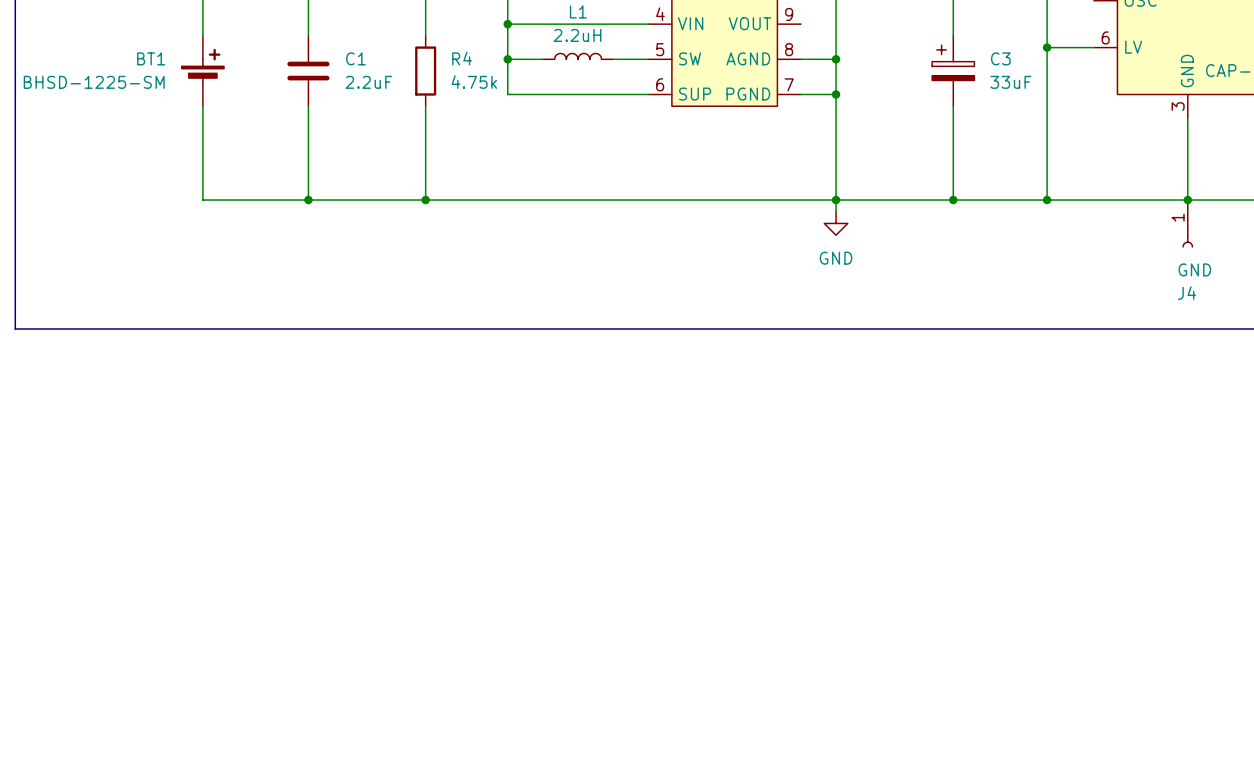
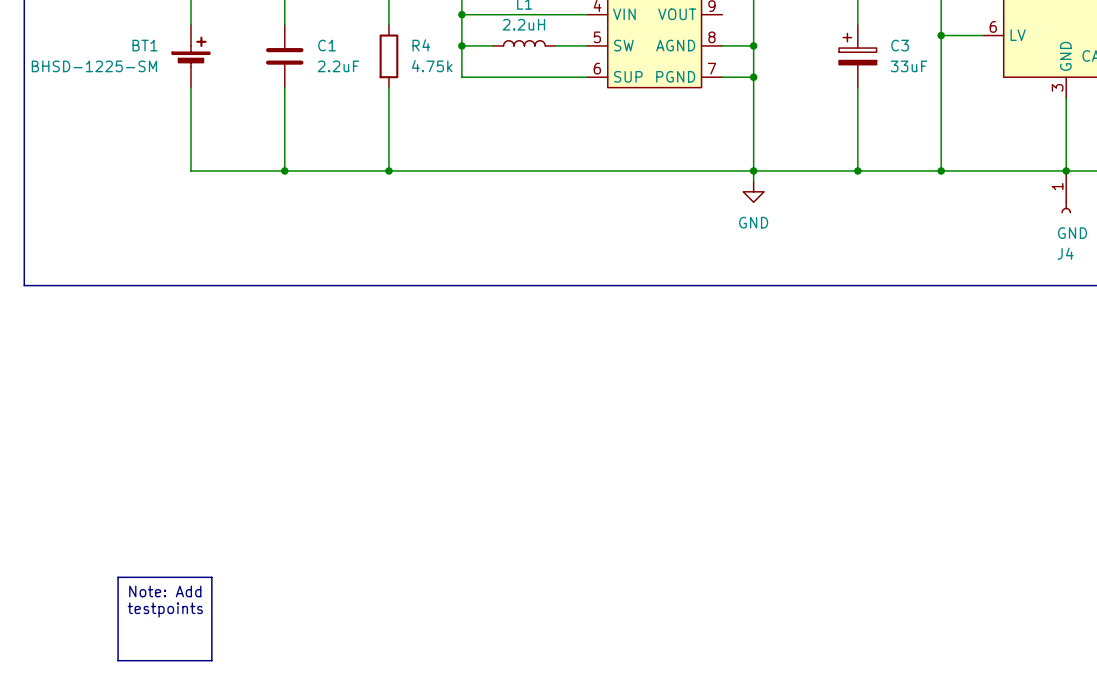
line: none -> (118, 577) (211, 577) (211, 660) (118, 660) (118, 577)
text: none -> Note: Add (165, 591)
text: none -> testpoints (165, 609)

